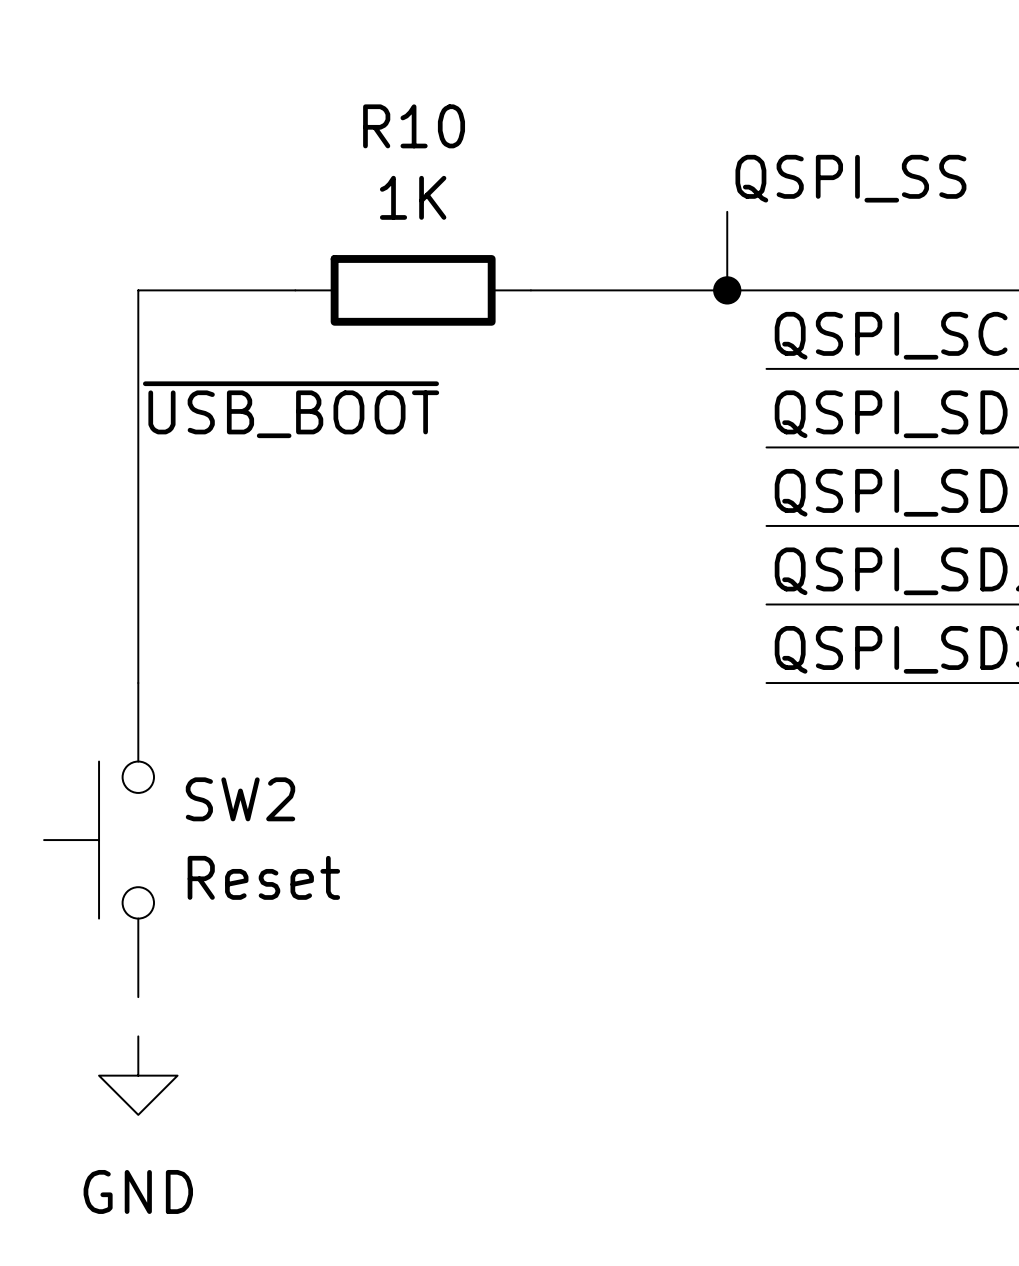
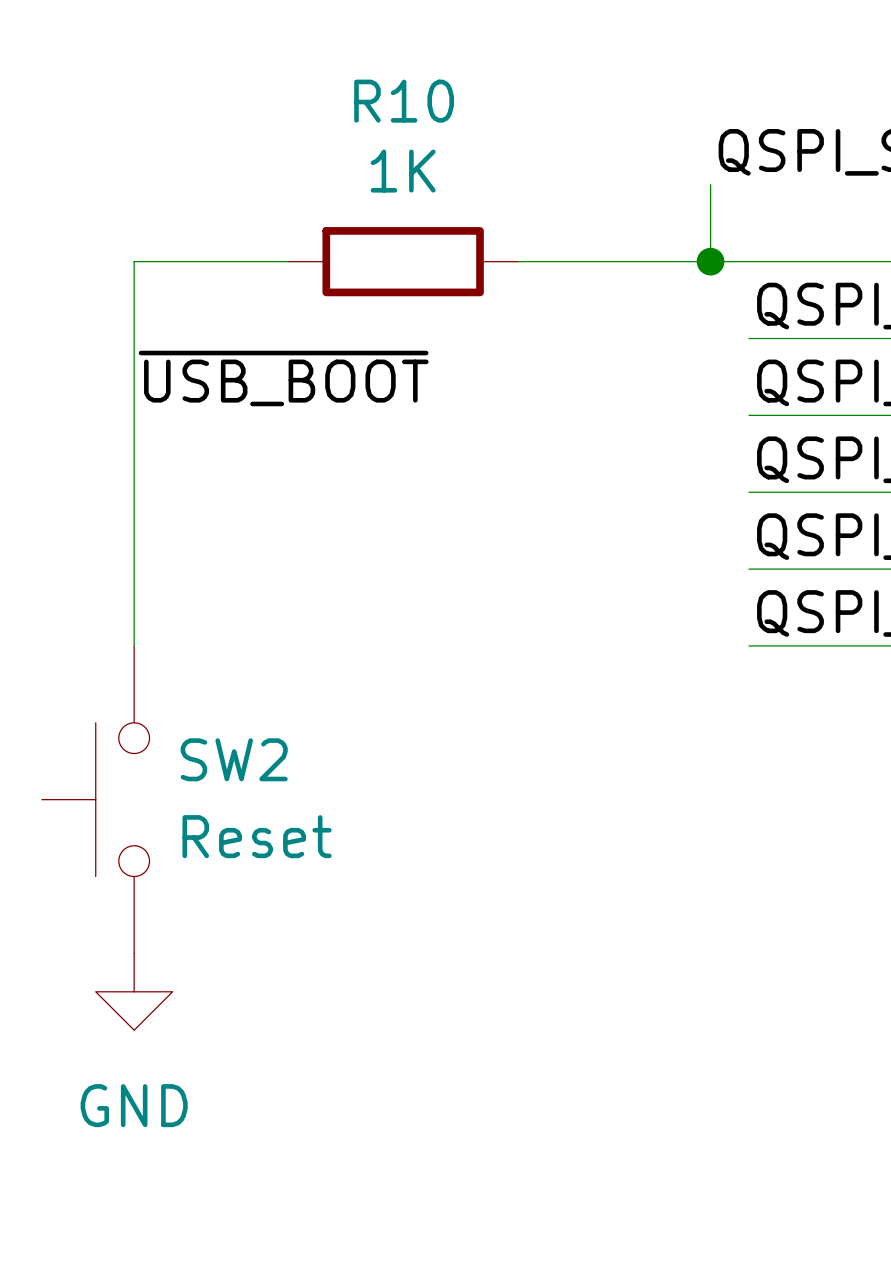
power symbol position: GND (138, 1075) -> GND (134, 991)

